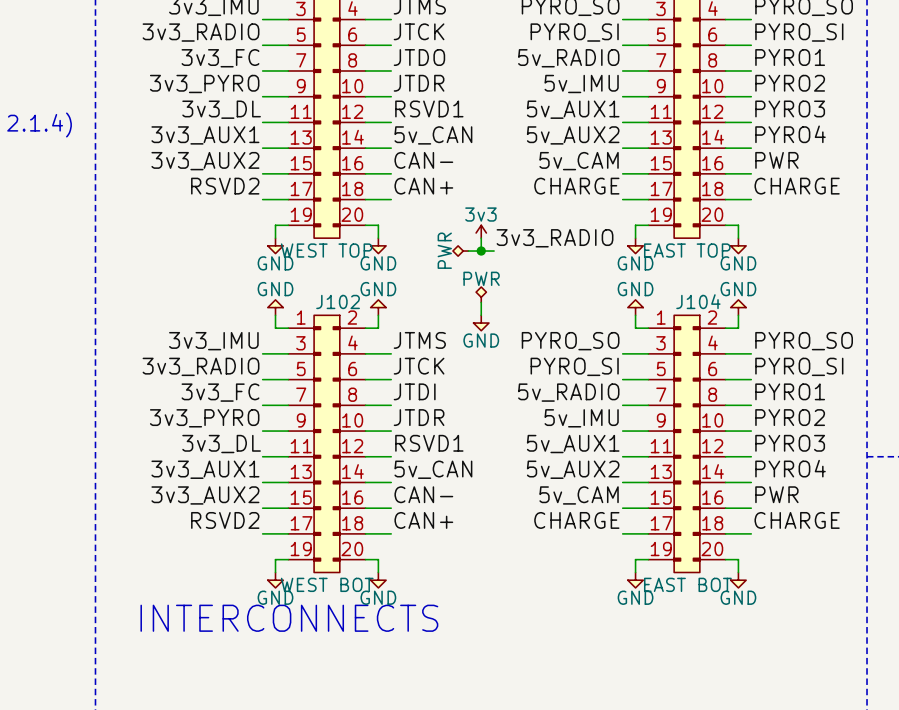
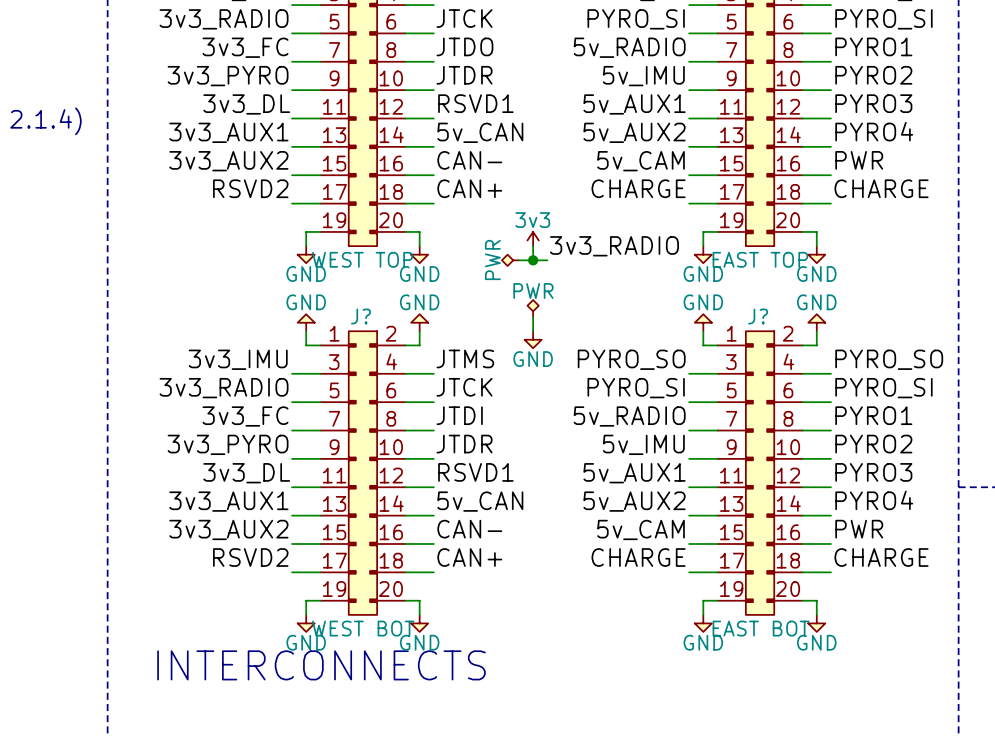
J102 name: J102 (338, 301) -> J? (361, 316)
J104 name: J104 (698, 301) -> J? (758, 316)

